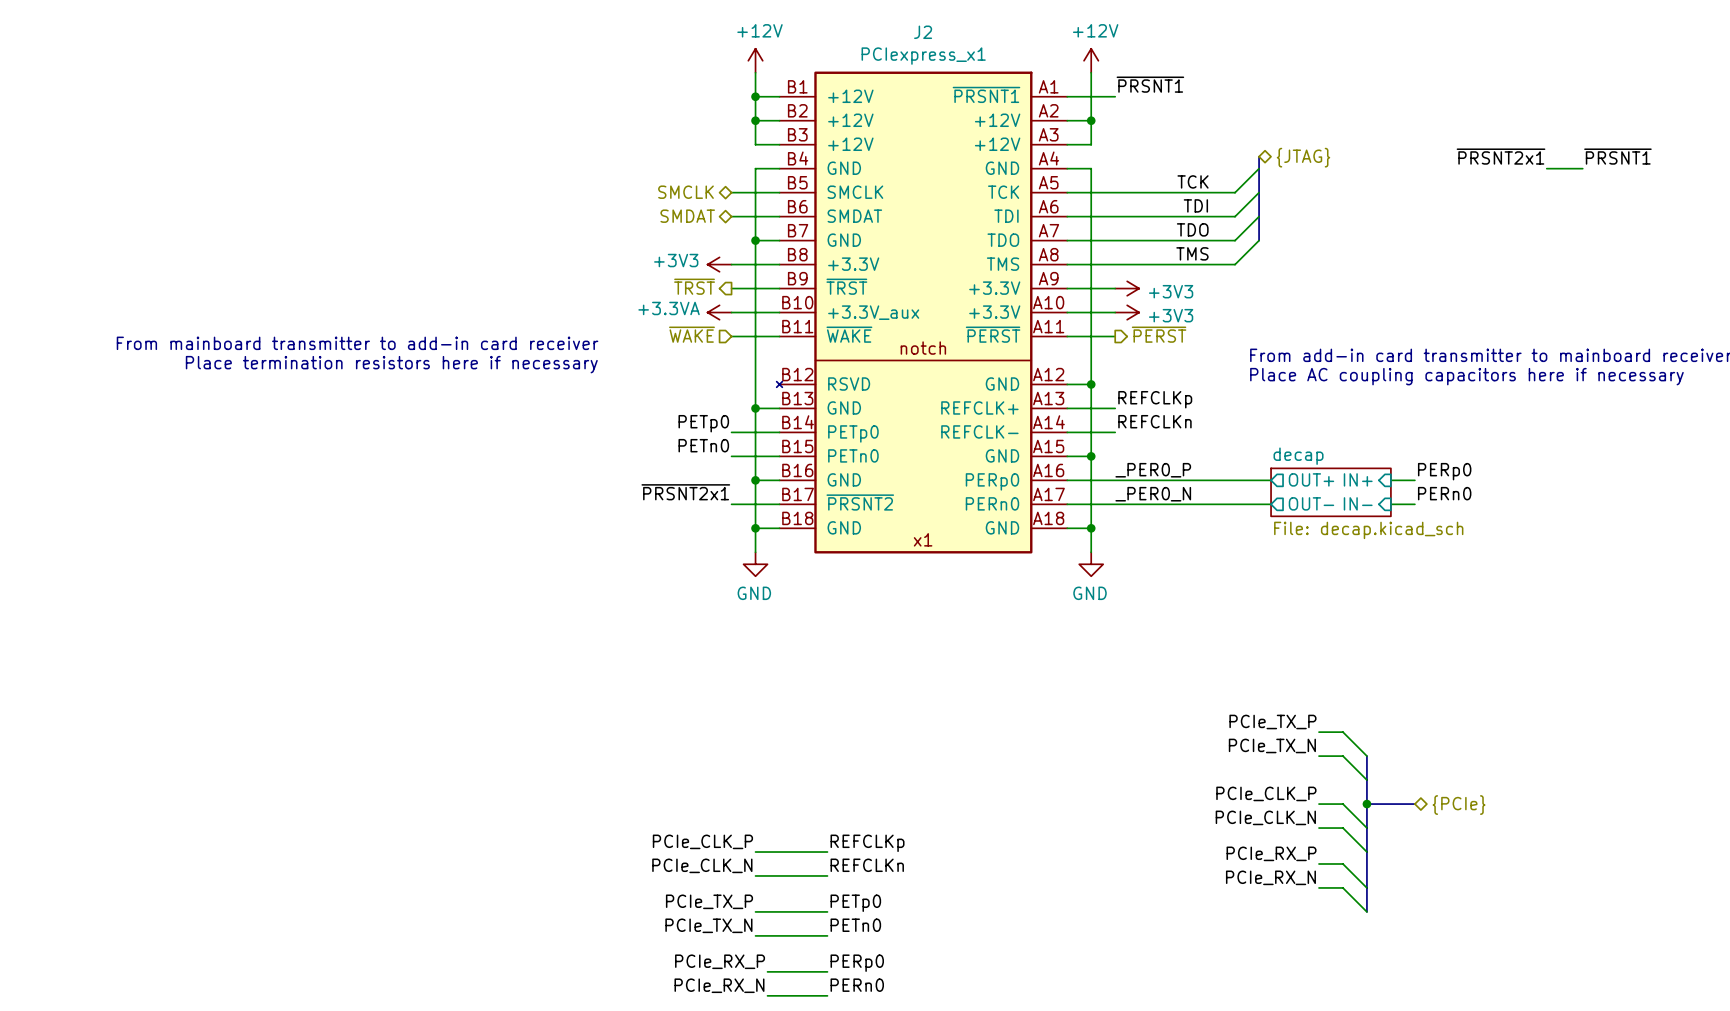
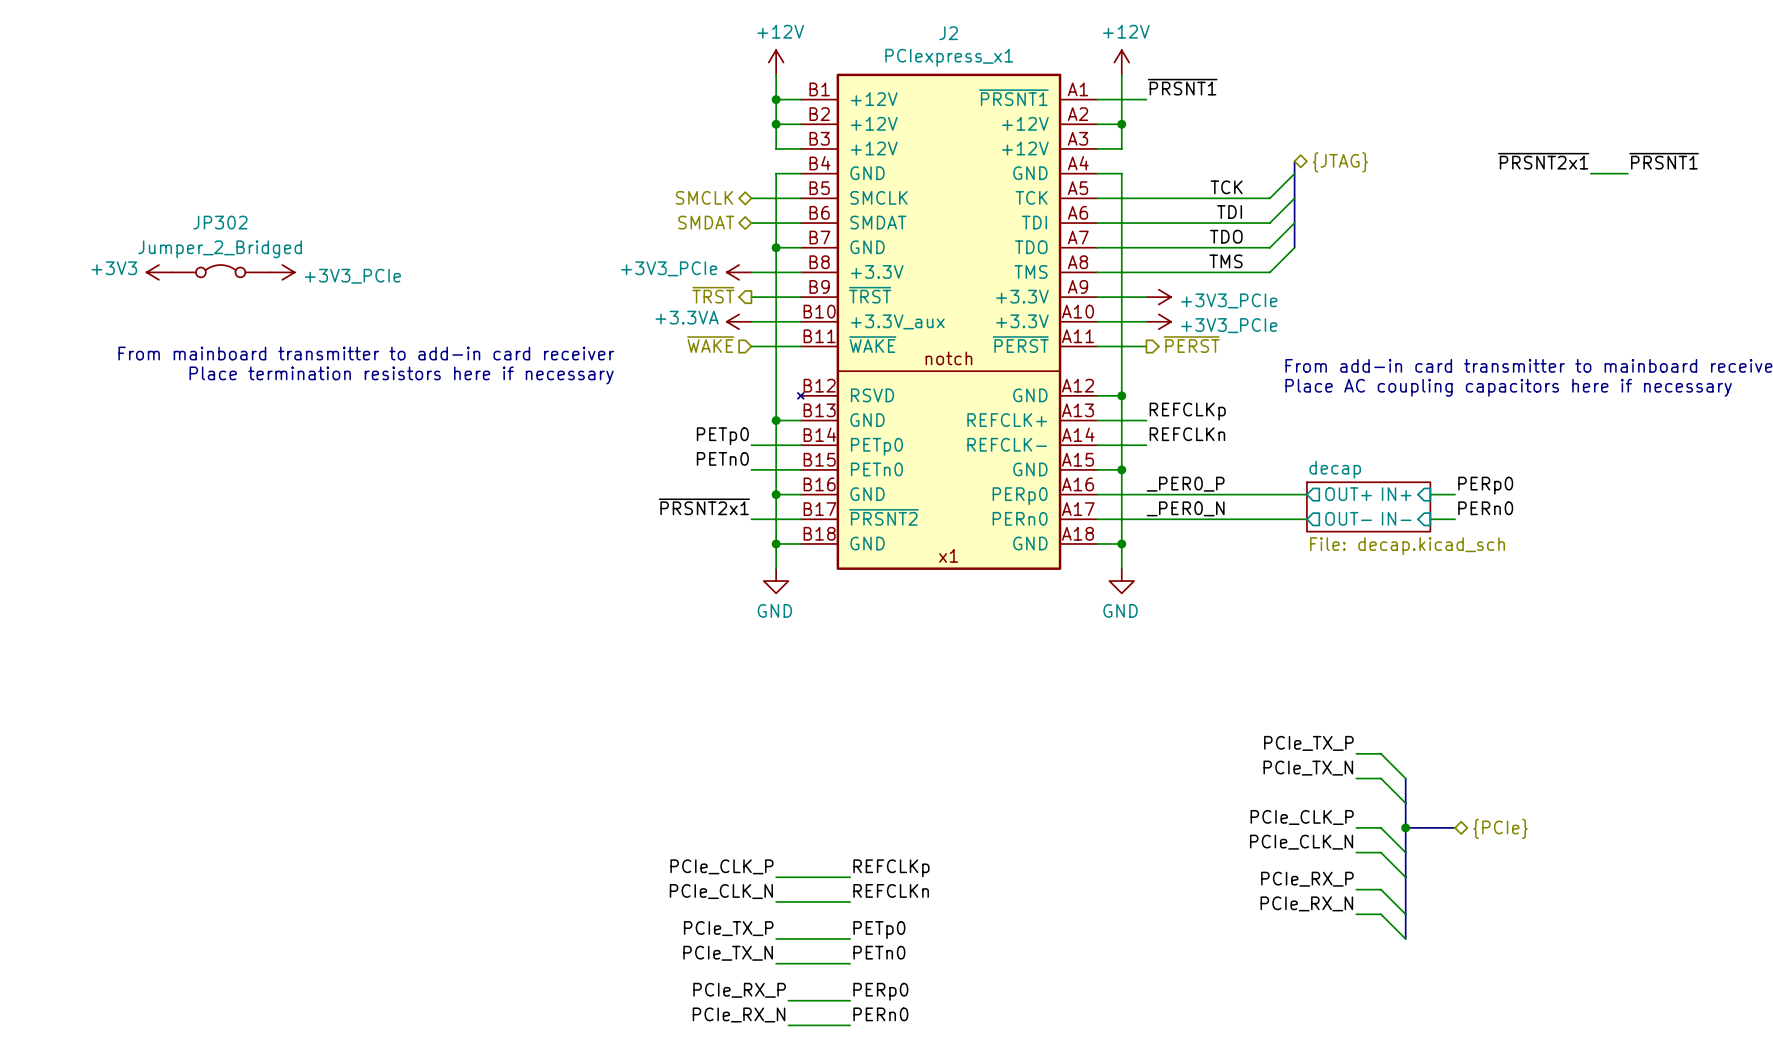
JP302: none -> Jumper_2_Bridged (220, 271)
power symbol: none -> +3V3 (158, 272)
power symbol: none -> +3V3_PCIe (282, 272)
power symbol: +3V3 (719, 264) -> +3V3_PCIe (739, 272)
power symbol: +3V3 (1127, 288) -> +3V3_PCIe (1158, 297)
power symbol: +3V3 (1127, 312) -> +3V3_PCIe (1158, 321)

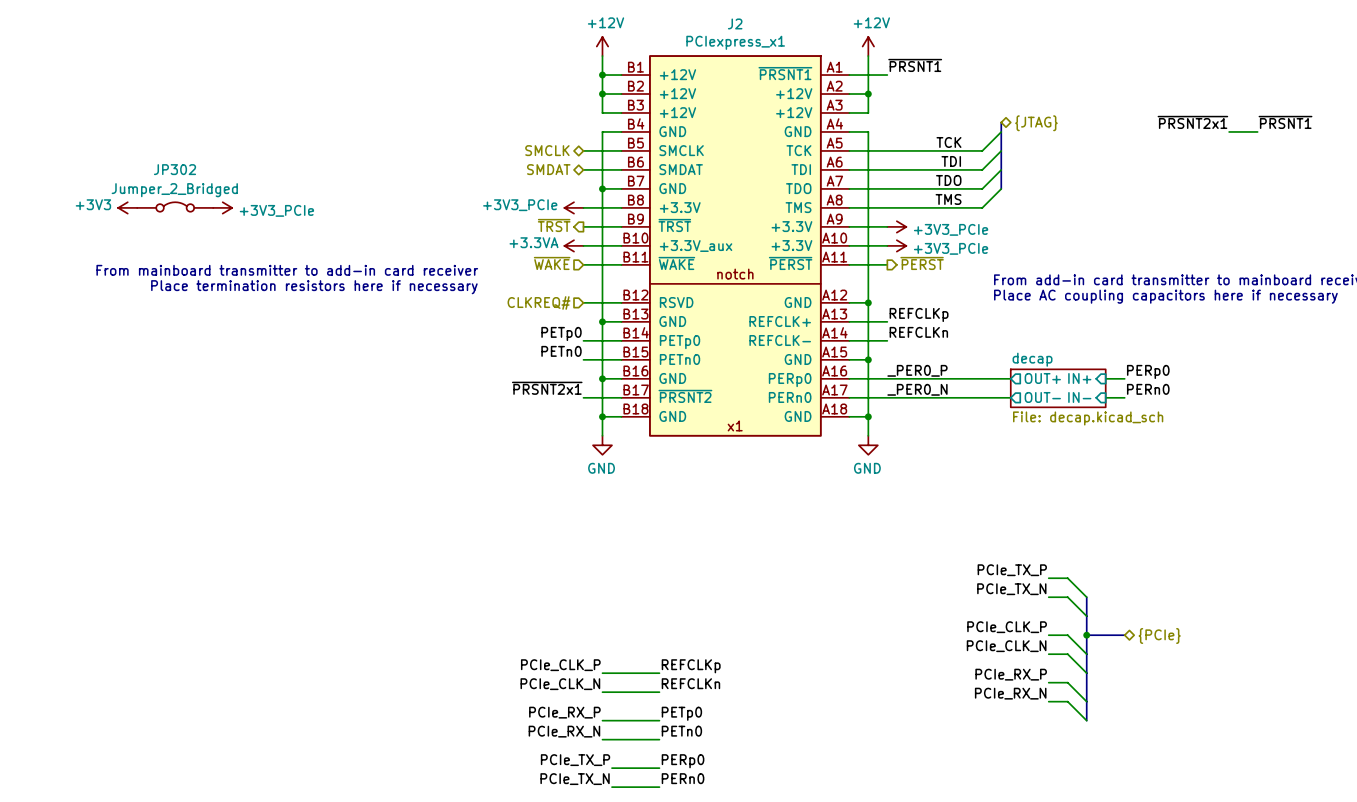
J2 symbol: [797, 73, 1098, 570] -> [621, 55, 850, 437]
hierarchical label: none -> CLKREQ# (539, 302)
wire: none -> (583, 302) (621, 302)
label: PCIe_TX_P (728, 928) -> PCIe_RX_P (564, 712)
label: PCIe_TX_N (728, 953) -> PCIe_RX_N (564, 731)
label: PCIe_RX_P (739, 990) -> PCIe_TX_P (575, 760)
label: PCIe_RX_N (739, 1014) -> PCIe_TX_N (575, 779)

